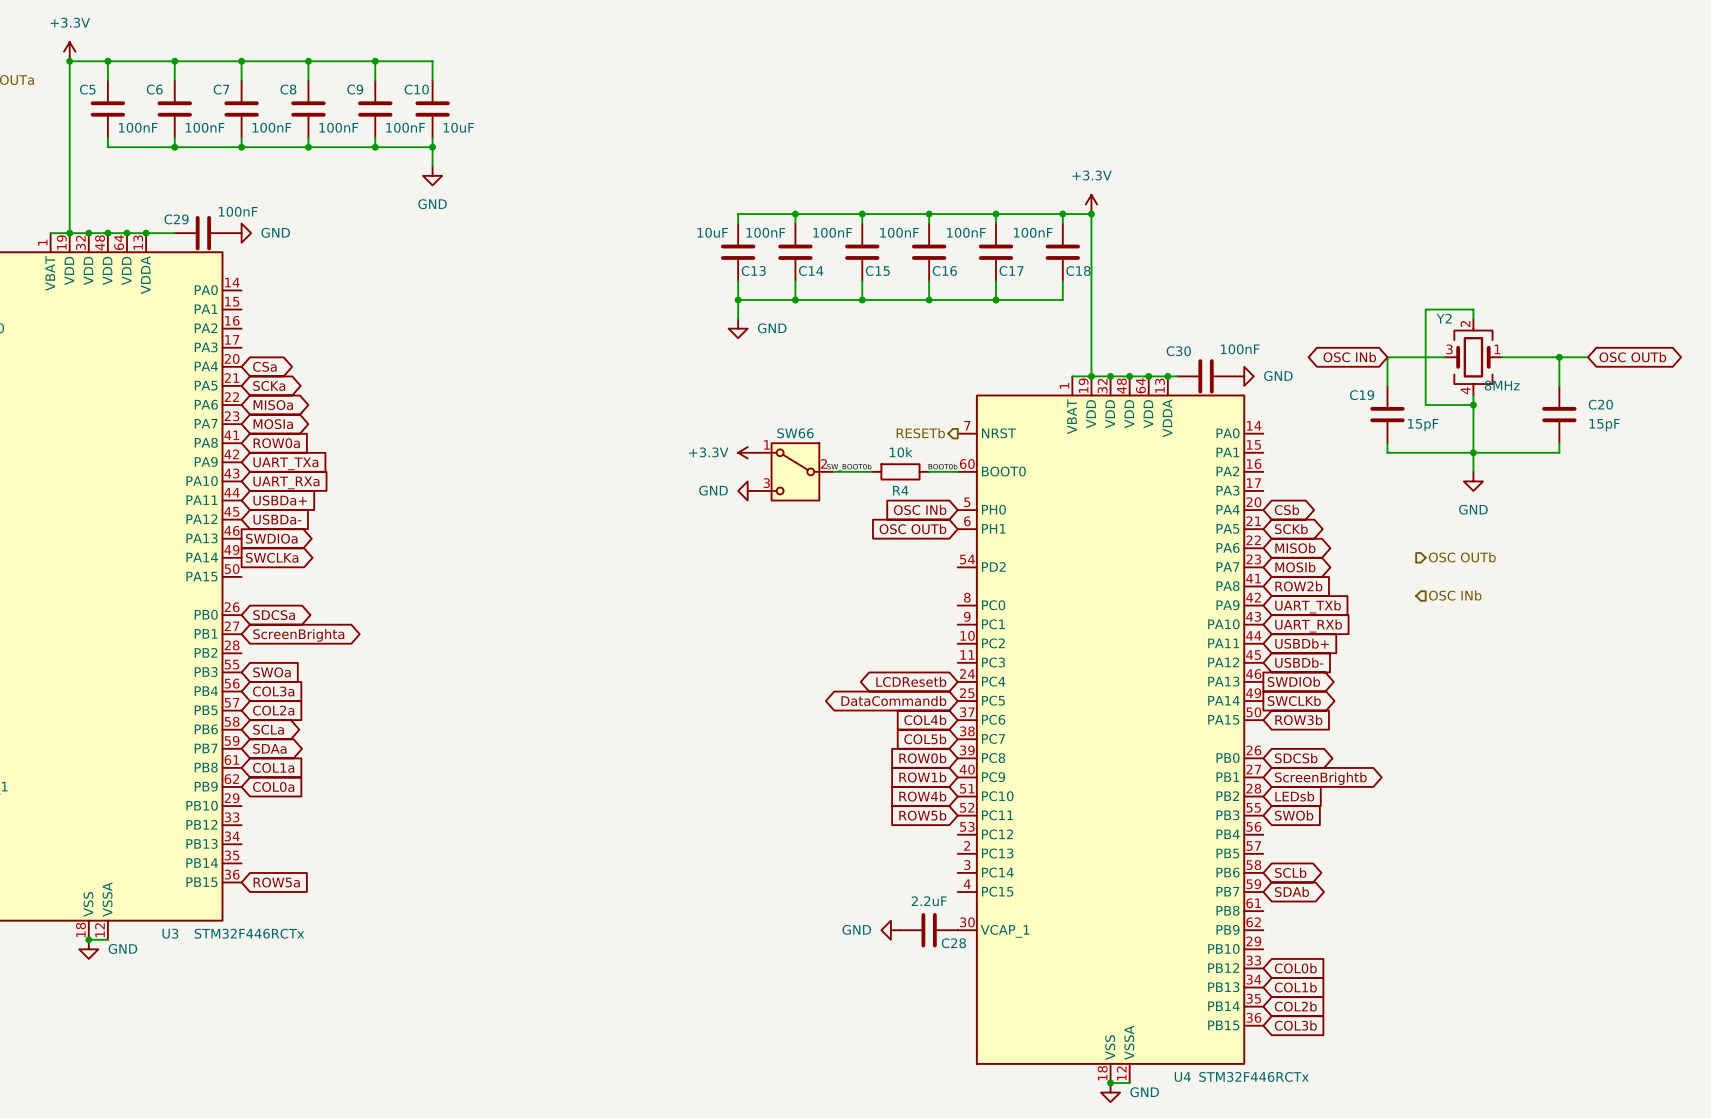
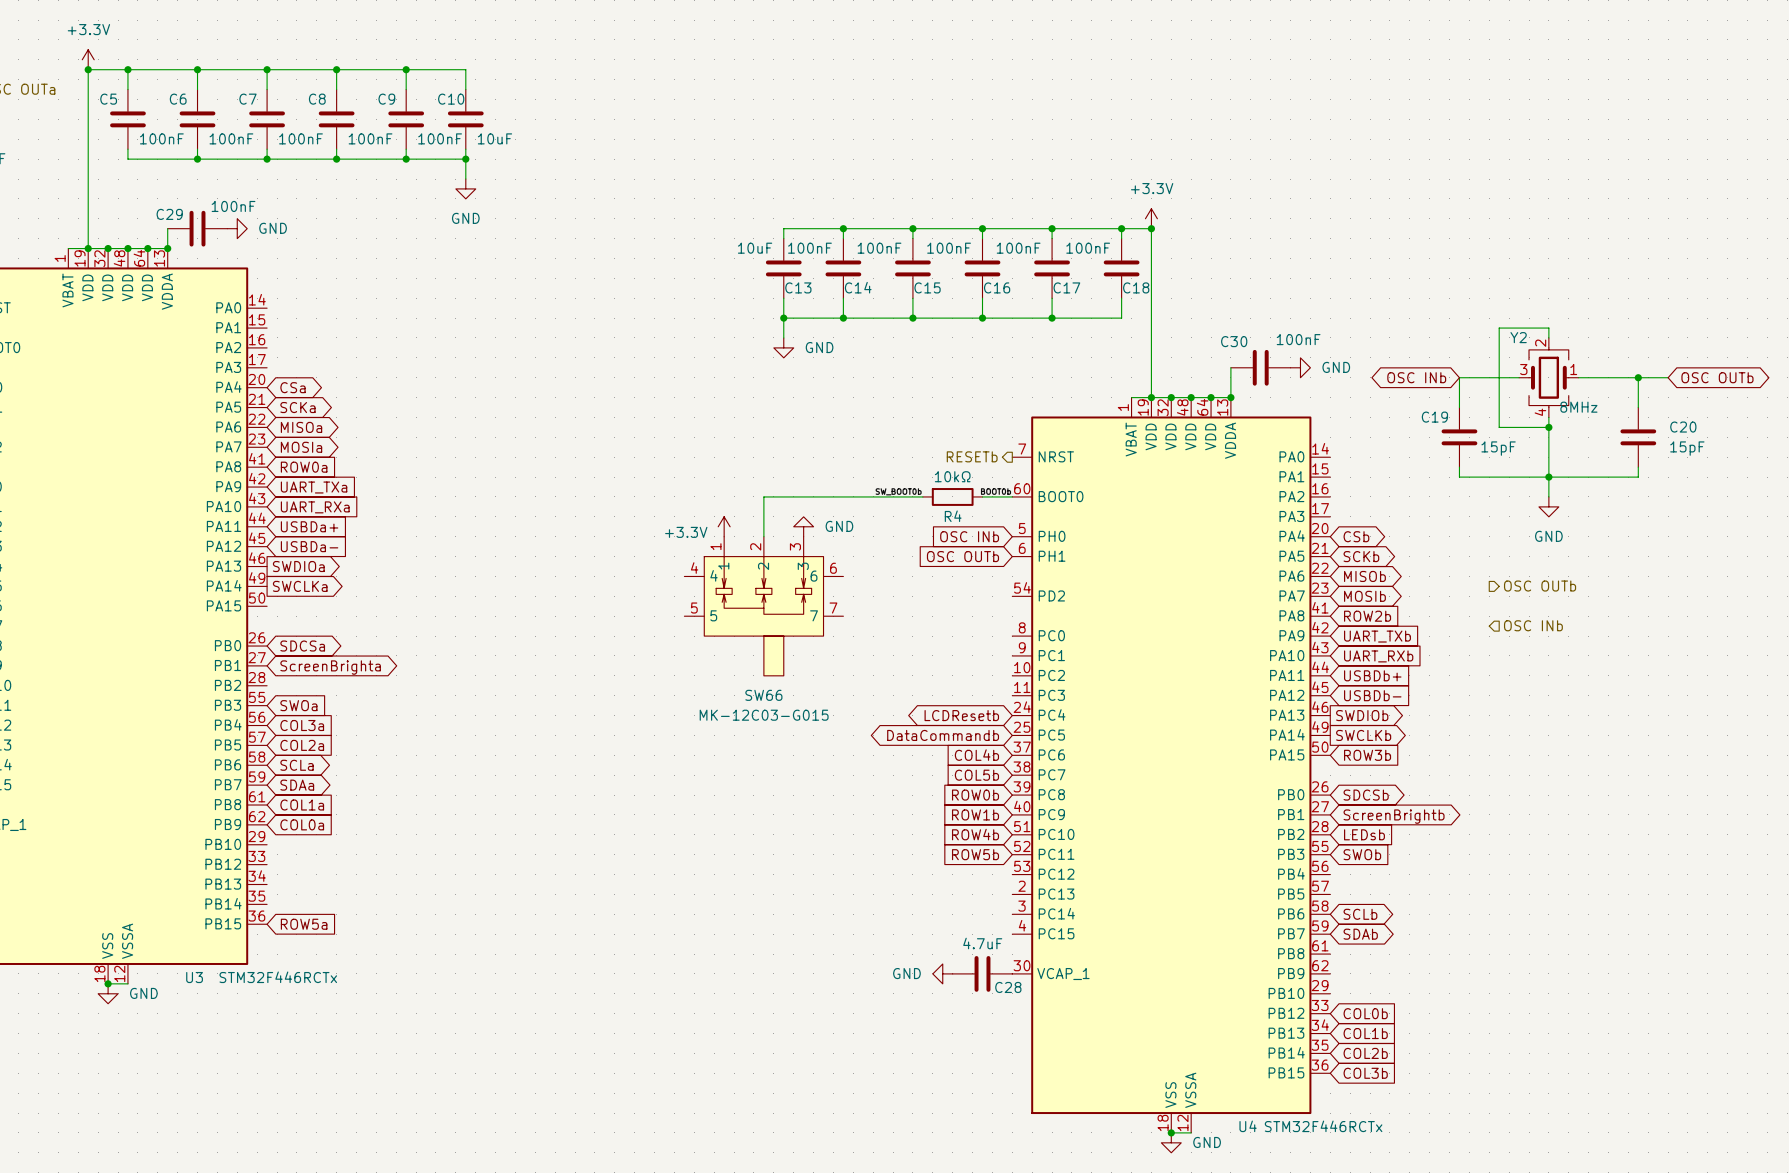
wire: (146, 233) (174, 233) -> (167, 248) (167, 228)
C29 position: (203, 233) -> (197, 228)
power symbol position: GND (241, 233) -> GND (237, 228)
wire: (1167, 376) (1177, 376) -> (1230, 397) (1230, 367)
C30 position: (1206, 376) -> (1260, 367)
power symbol position: GND (1244, 376) -> GND (1300, 367)
SW66 name position: SW66 (795, 433) -> SW66 (763, 695)
SW66 symbol: [757, 443, 834, 501] -> [684, 536, 844, 676]
power symbol rotation: 0° (747, 452) -> 90° clockwise (724, 526)
power symbol position: +3.3V (747, 452) -> +3.3V (724, 526)
R4 value: 10k (901, 452) -> 10kΩ (952, 476)
wire: none -> (883, 496) (763, 496) (763, 536)
power symbol text position: GND (713, 490) -> GND (839, 526)
power symbol rotation: 0° (747, 490) -> 90° clockwise (803, 526)
power symbol position: GND (747, 490) -> GND (803, 526)
SW66 value: none -> MK-12C03-G015 (764, 715)
C28 value: 2.2uF (929, 901) -> 4.7uF (982, 943)

